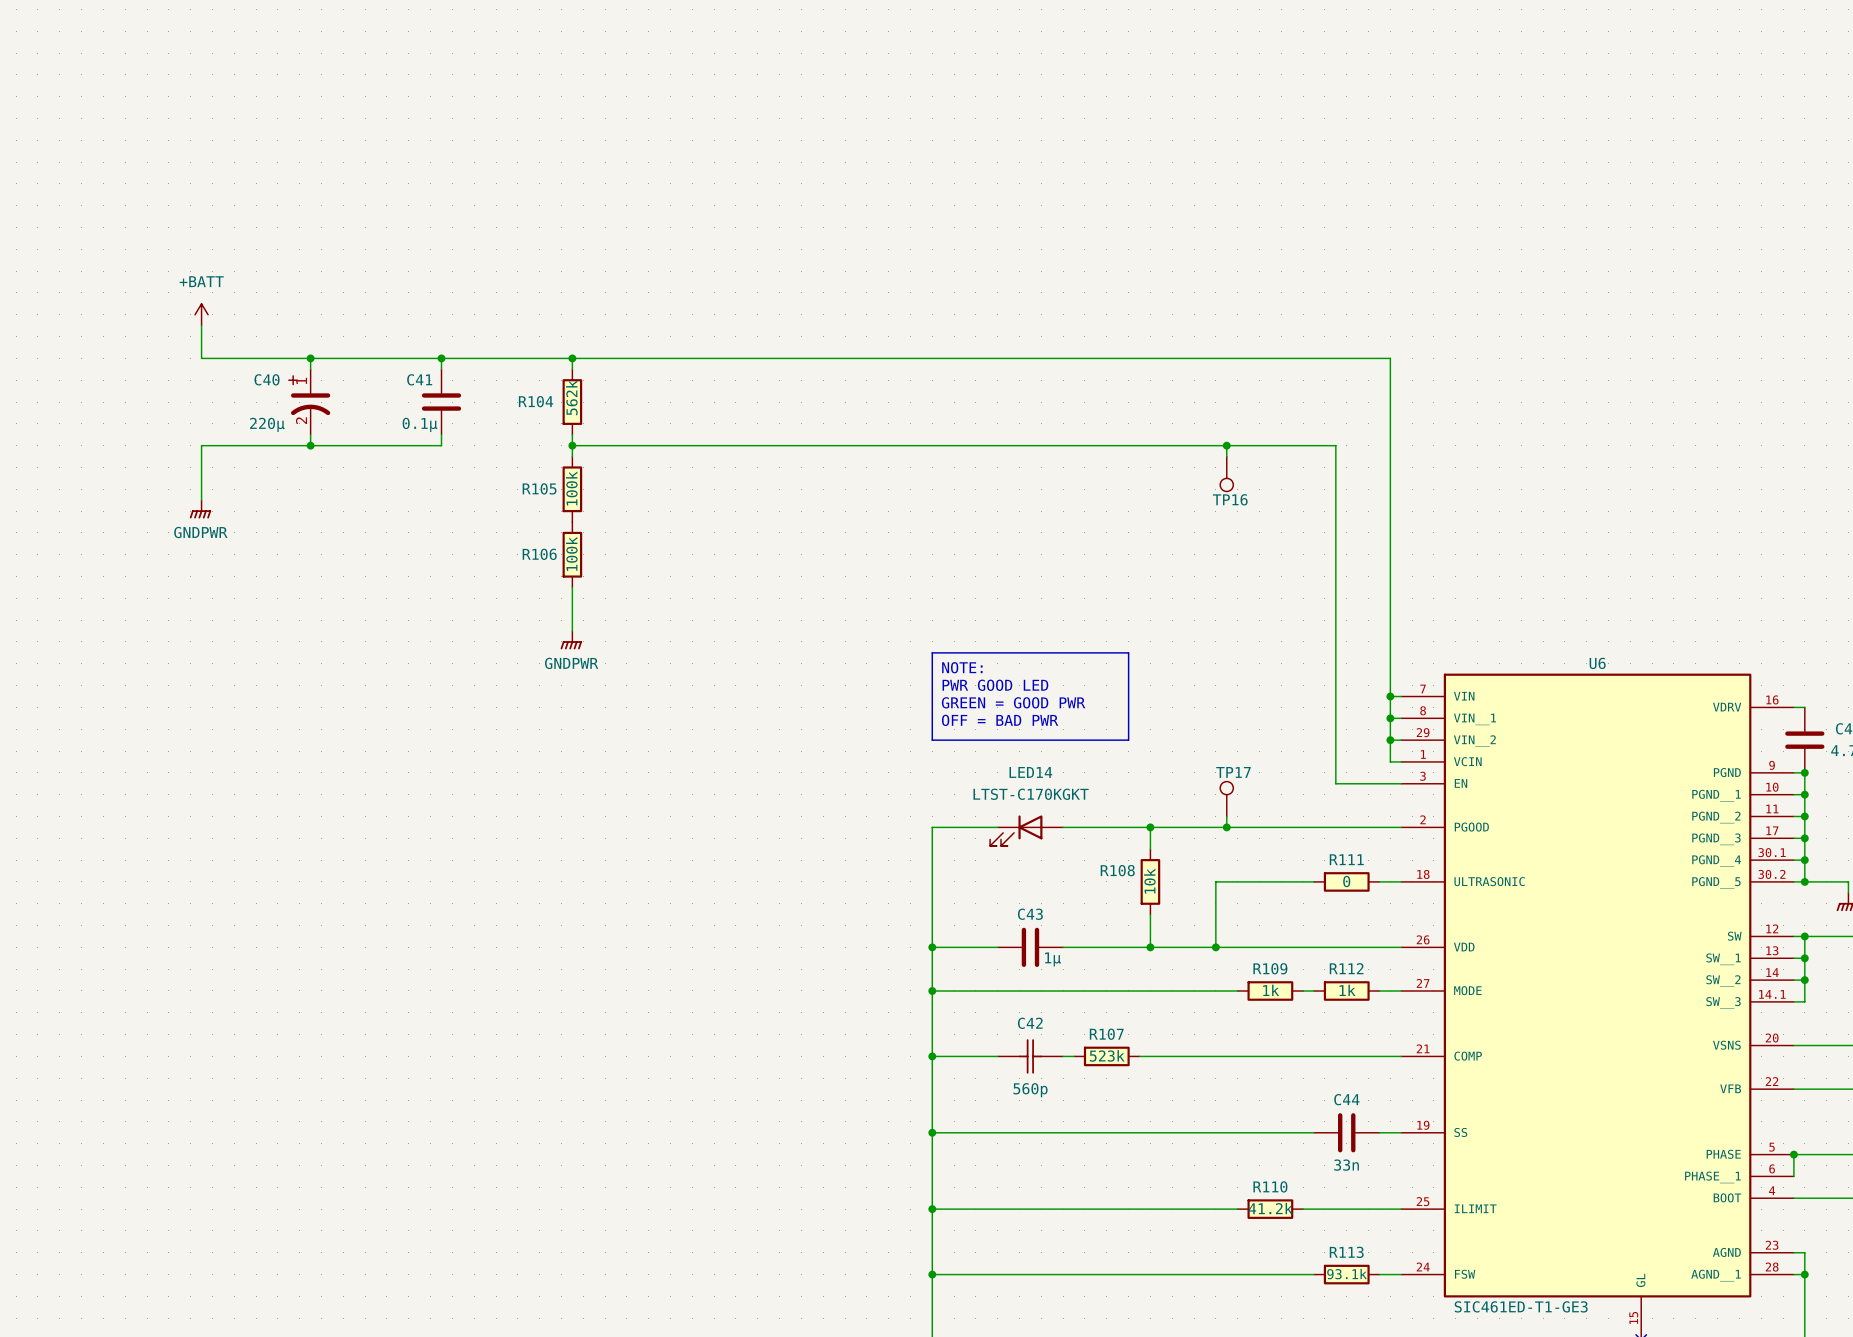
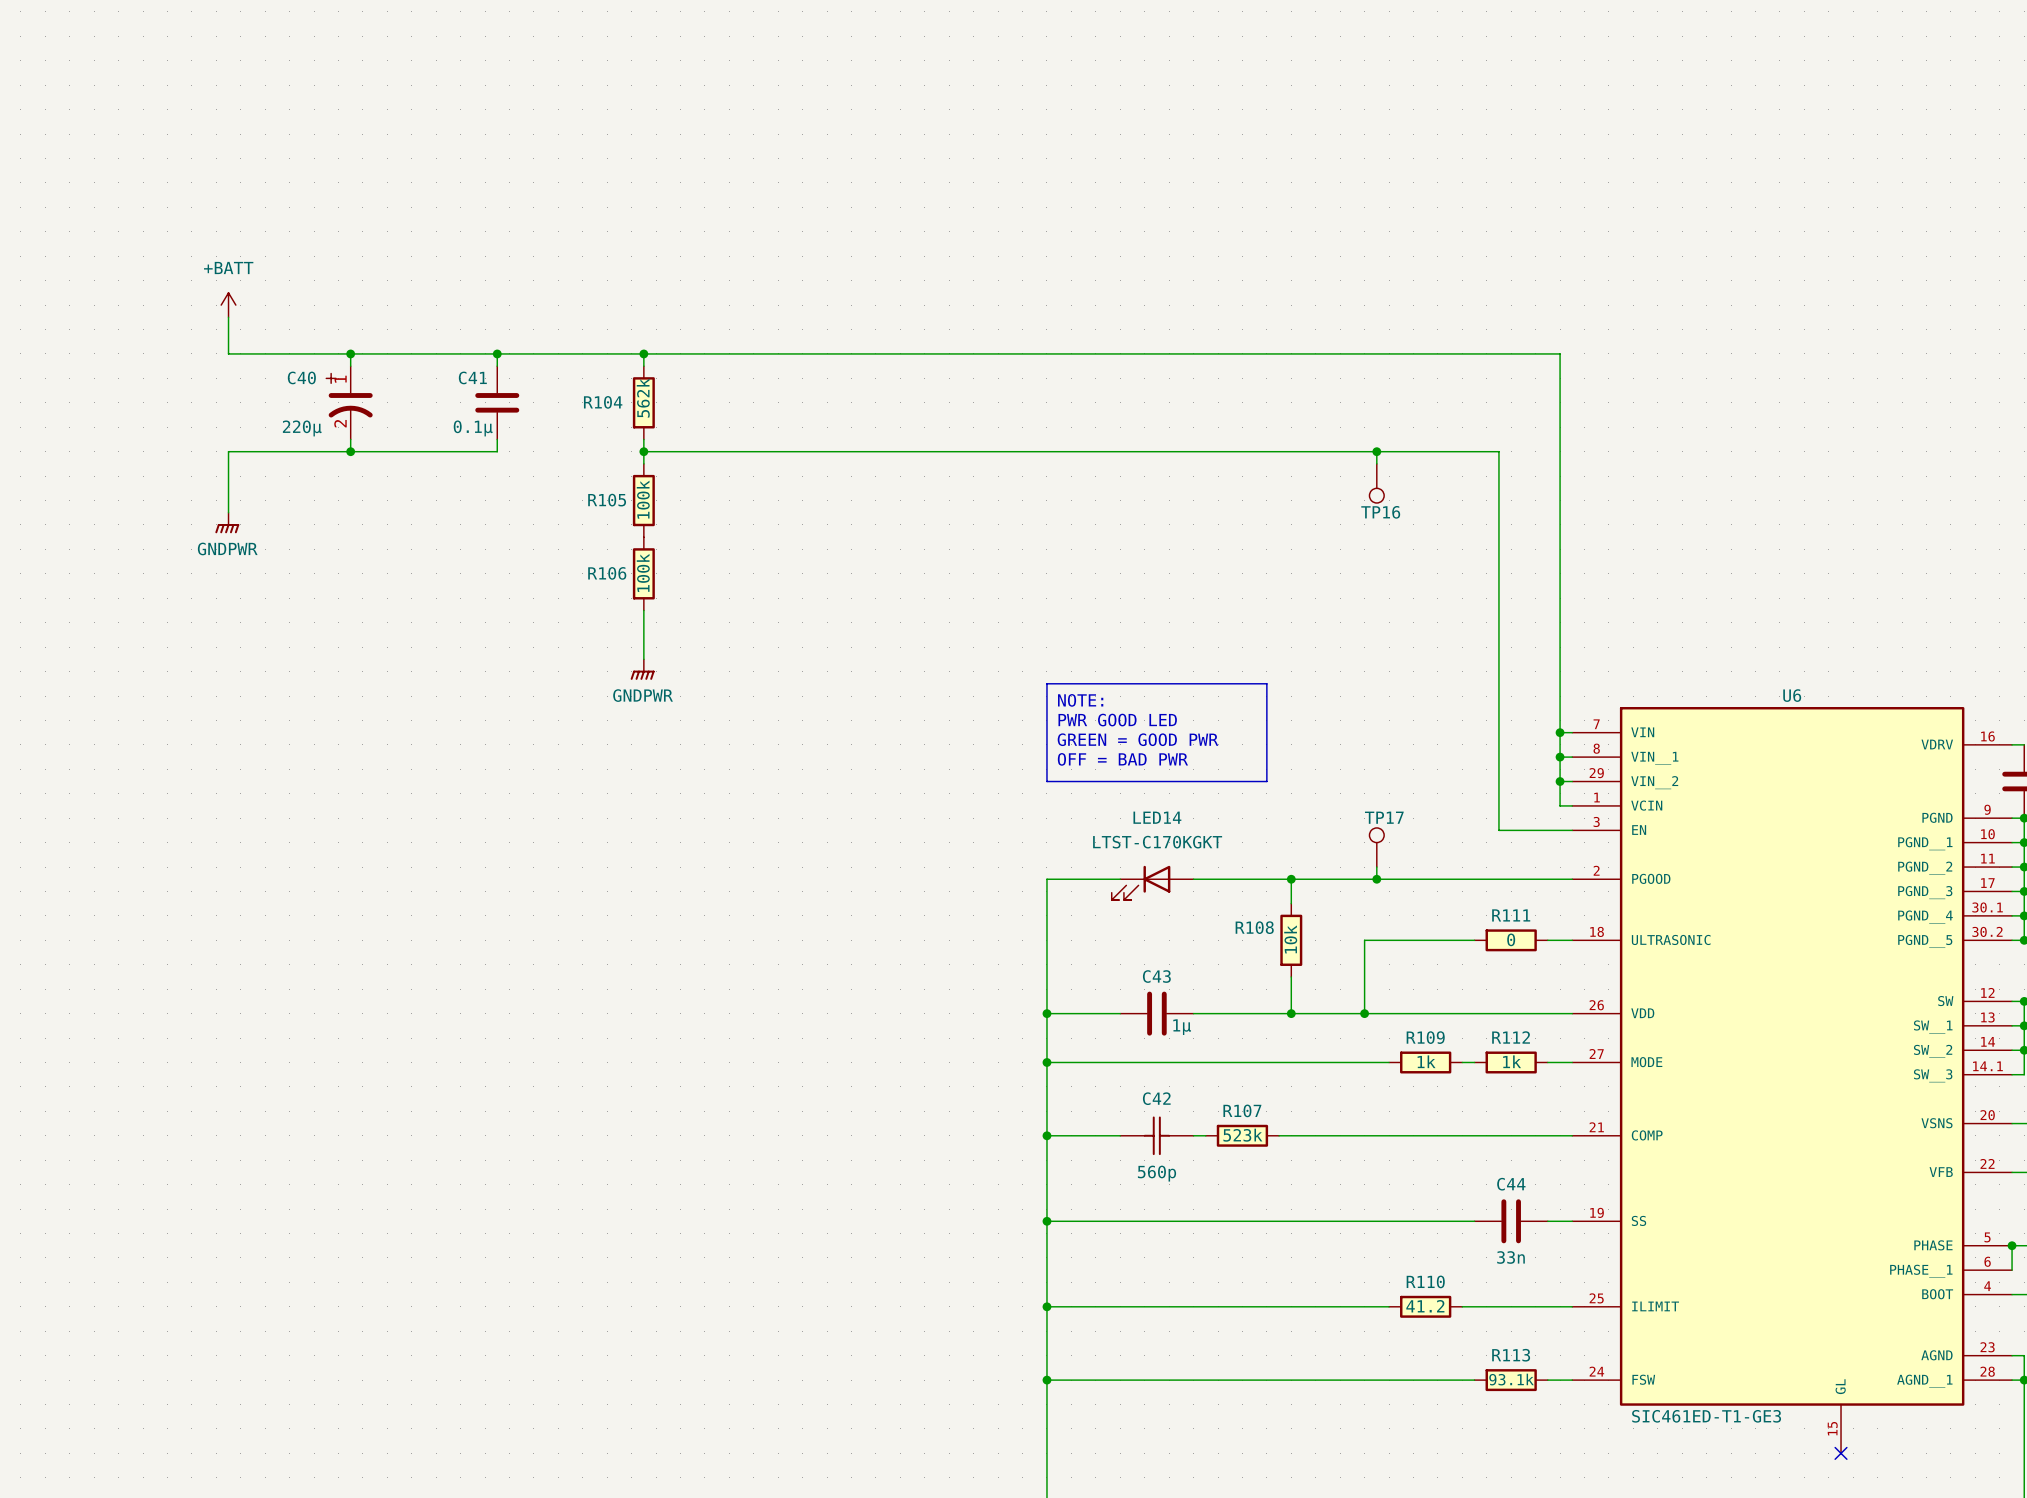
R110 value: 41.2k (1270, 1208) -> 41.2 (1425, 1306)

